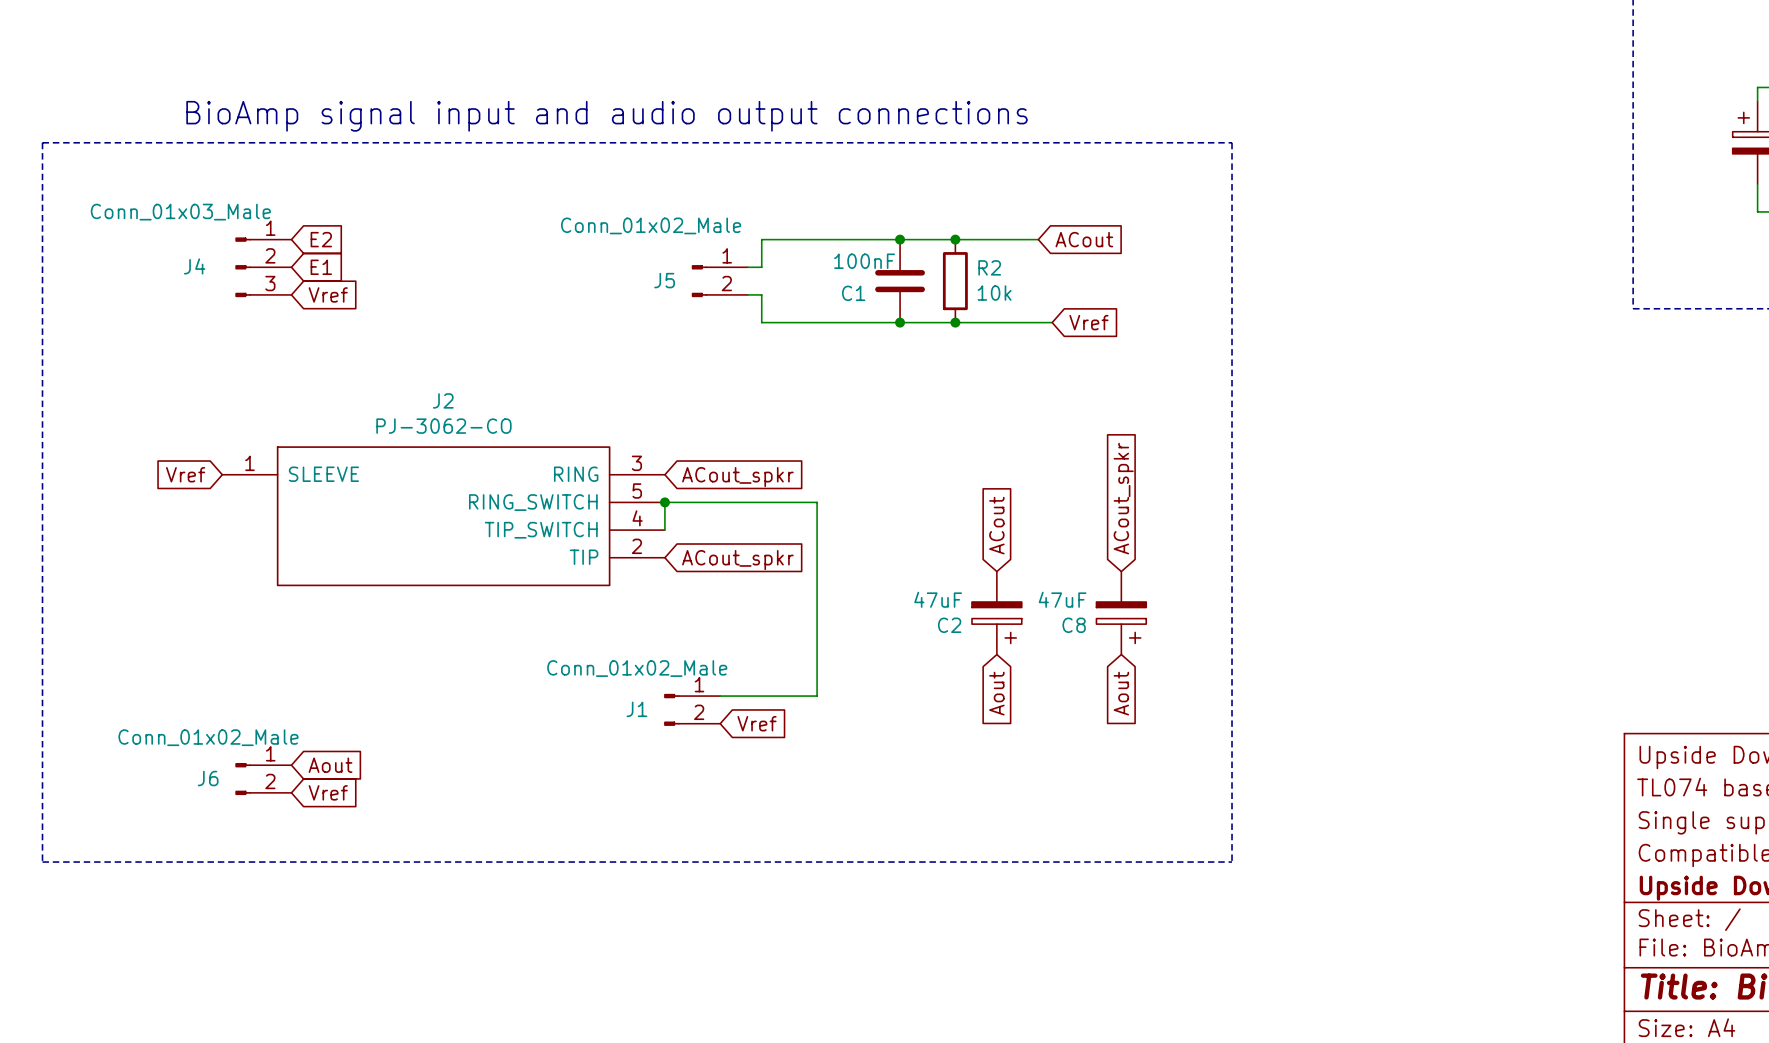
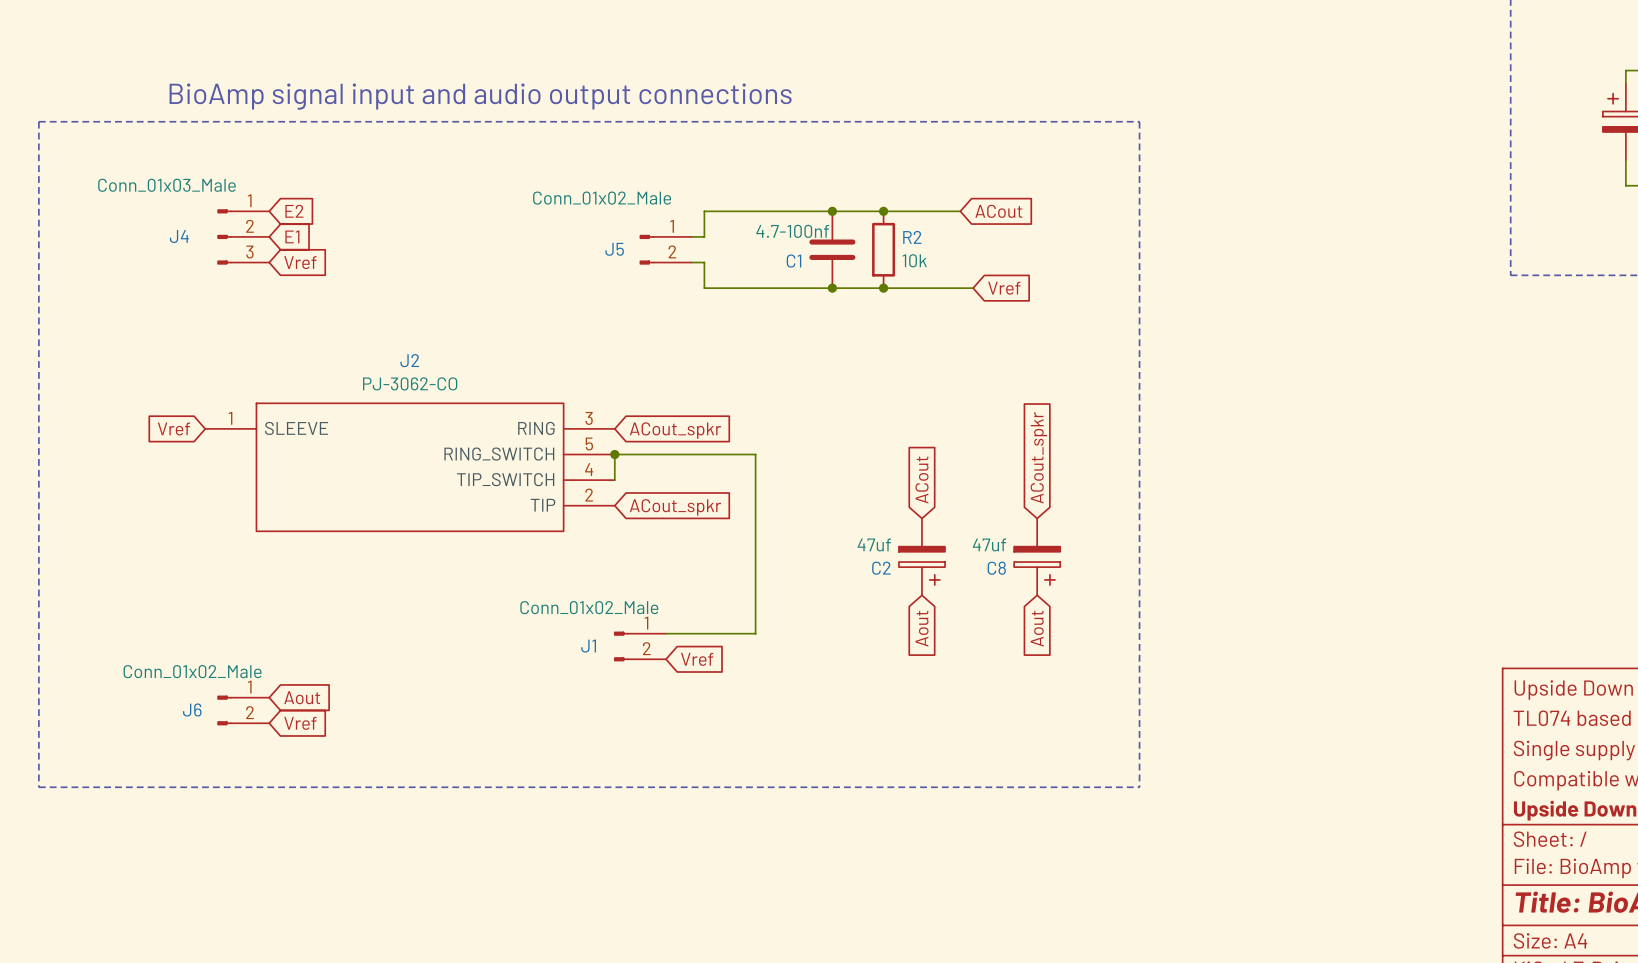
C1 value: 100nF (864, 261) -> 4.7-100nf (792, 231)
C2 value: 47uF (938, 599) -> 47uf (874, 544)
C8 value: 47uF (1062, 599) -> 47uf (989, 544)

